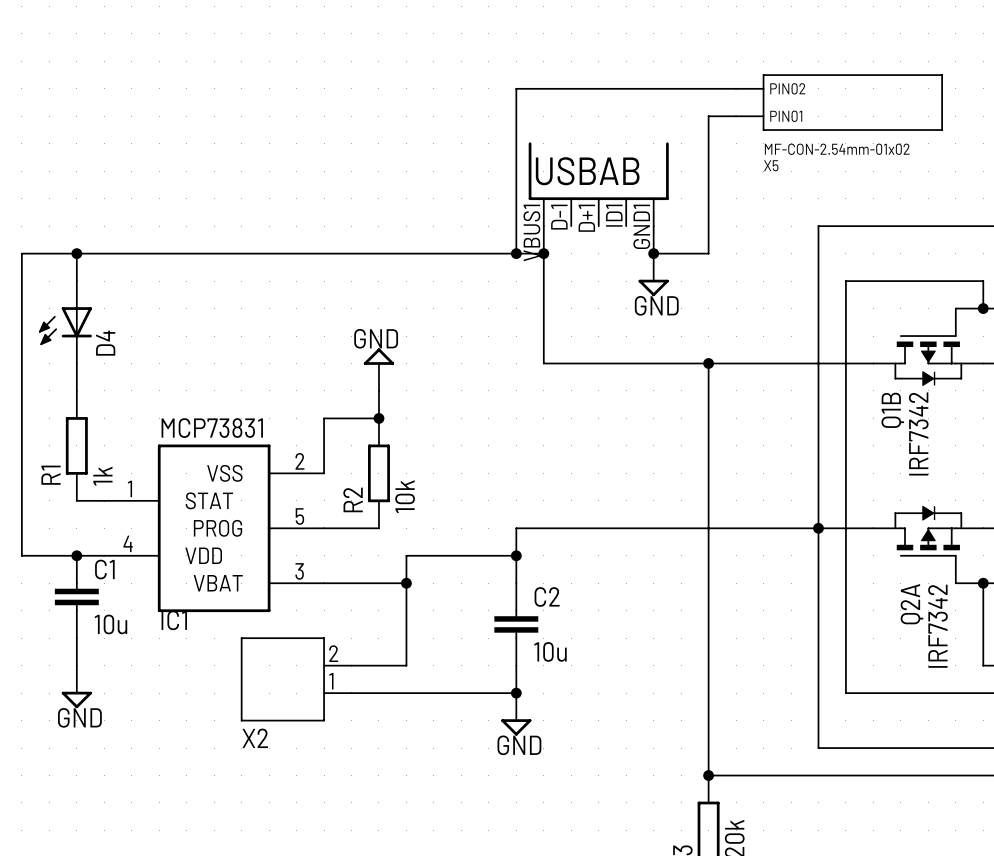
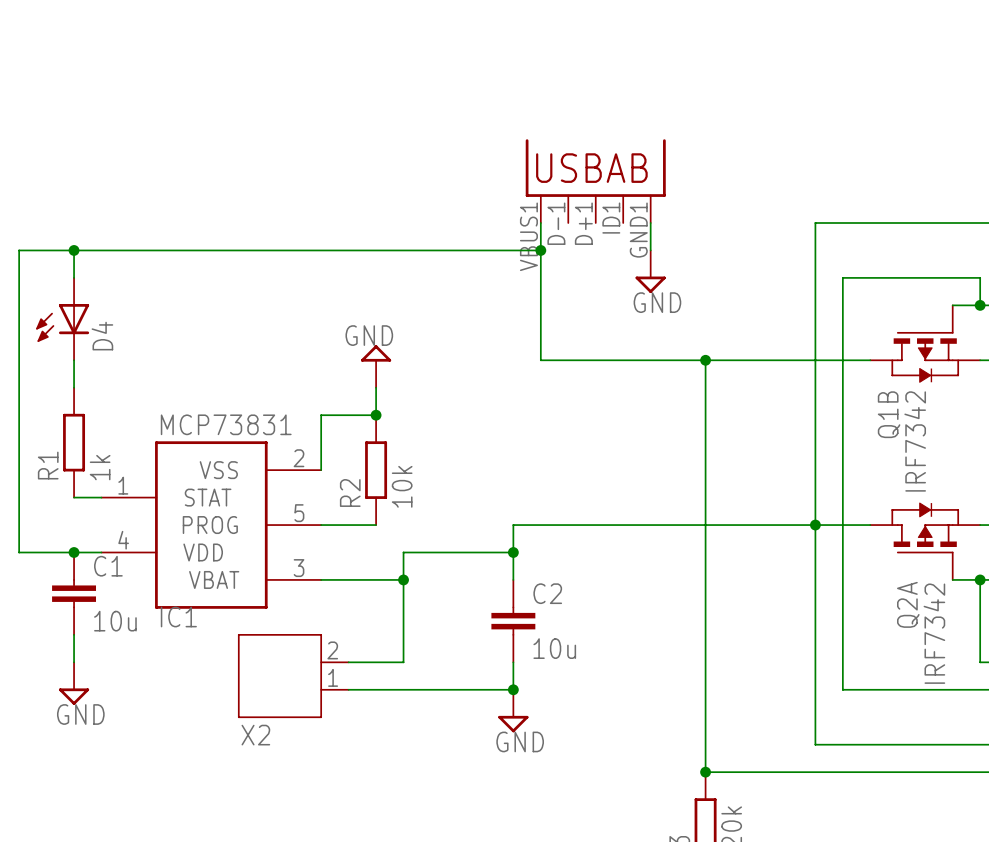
wire: (736, 88) (516, 88) (516, 253) -> none
X5: MF-CON-2.54mm-01x02 (839, 102) -> none
wire: (736, 116) (708, 116) (708, 253) (653, 253) -> none
junction: (516, 253) -> none
junction: (653, 253) -> none

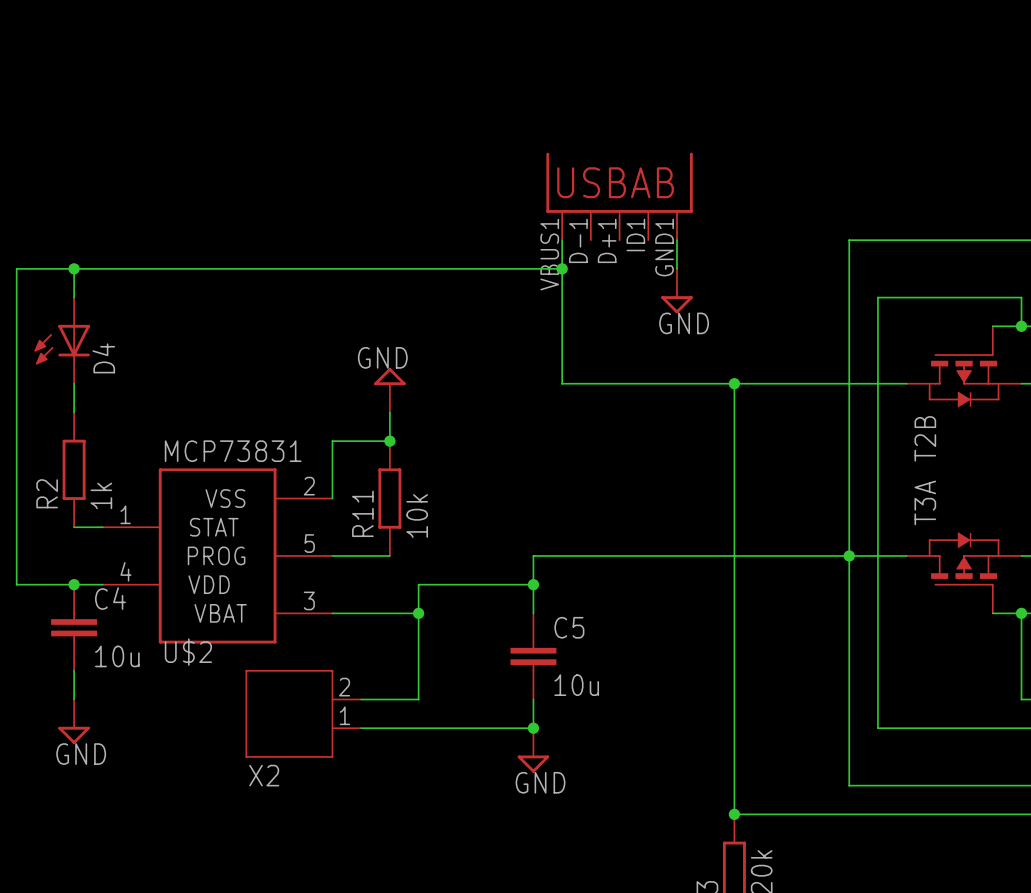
Q1B name: Q1B (889, 414) -> T2B (925, 438)
Q1B value: IRF7342 (915, 441) -> none
R1 name: R1 (48, 465) -> R2 (47, 493)
R2 name: R2 (350, 493) -> R11 (362, 513)
C1 name: C1 (108, 566) -> C4 (110, 598)
C2 name: C2 (547, 593) -> C5 (569, 627)
Q2A name: Q2A (908, 604) -> T3A (925, 502)
IC1 name: IC1 (178, 617) -> U$2 (188, 652)
Q2A value: IRF7342 (934, 633) -> none

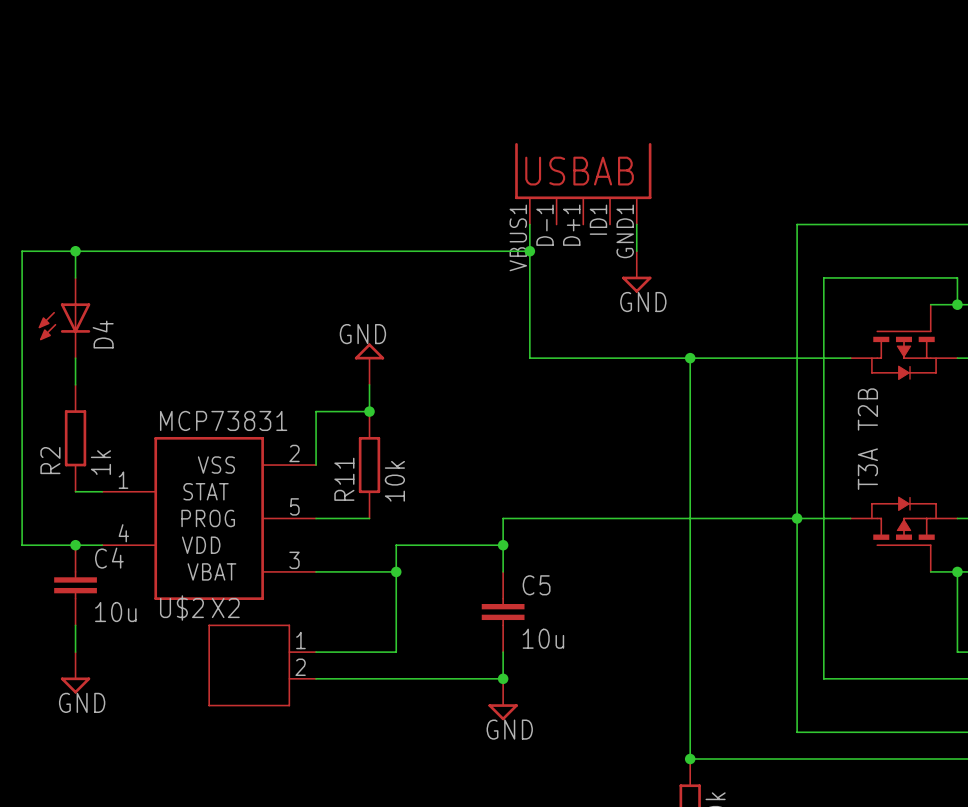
X2 flip: as is (289, 713) -> up-down (249, 665)

